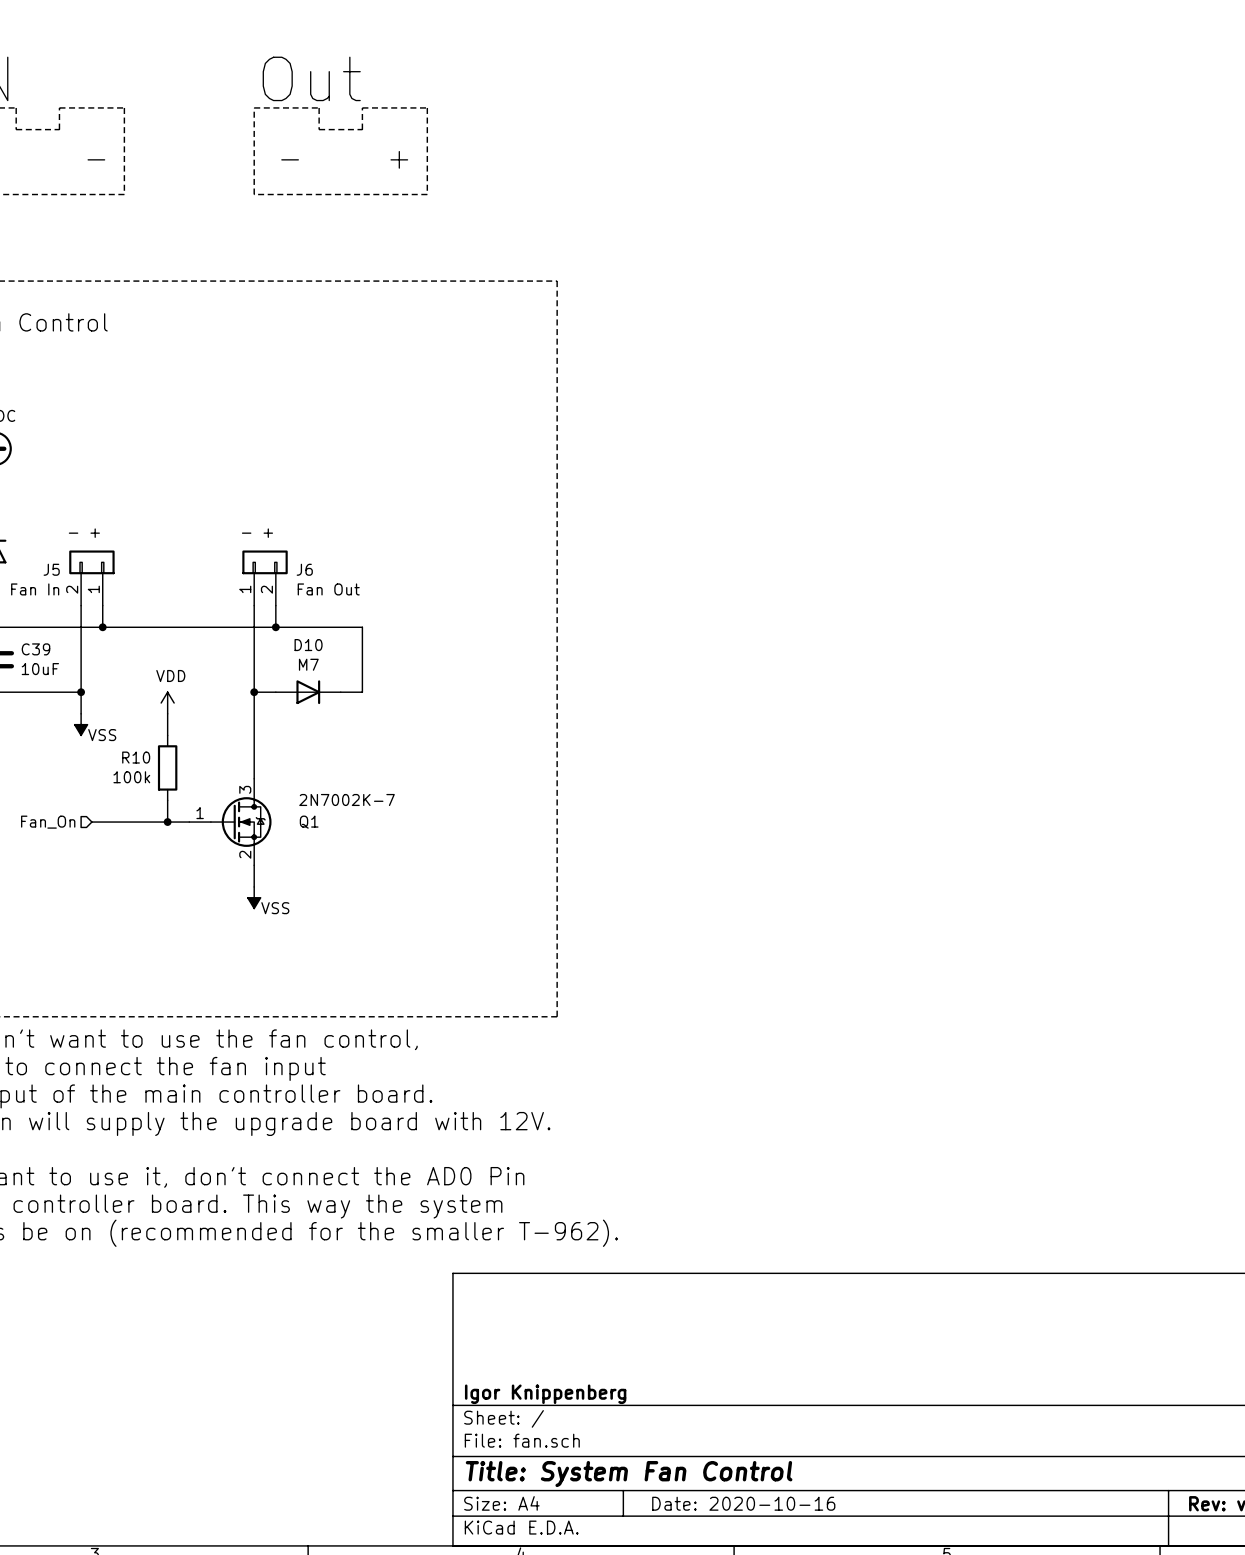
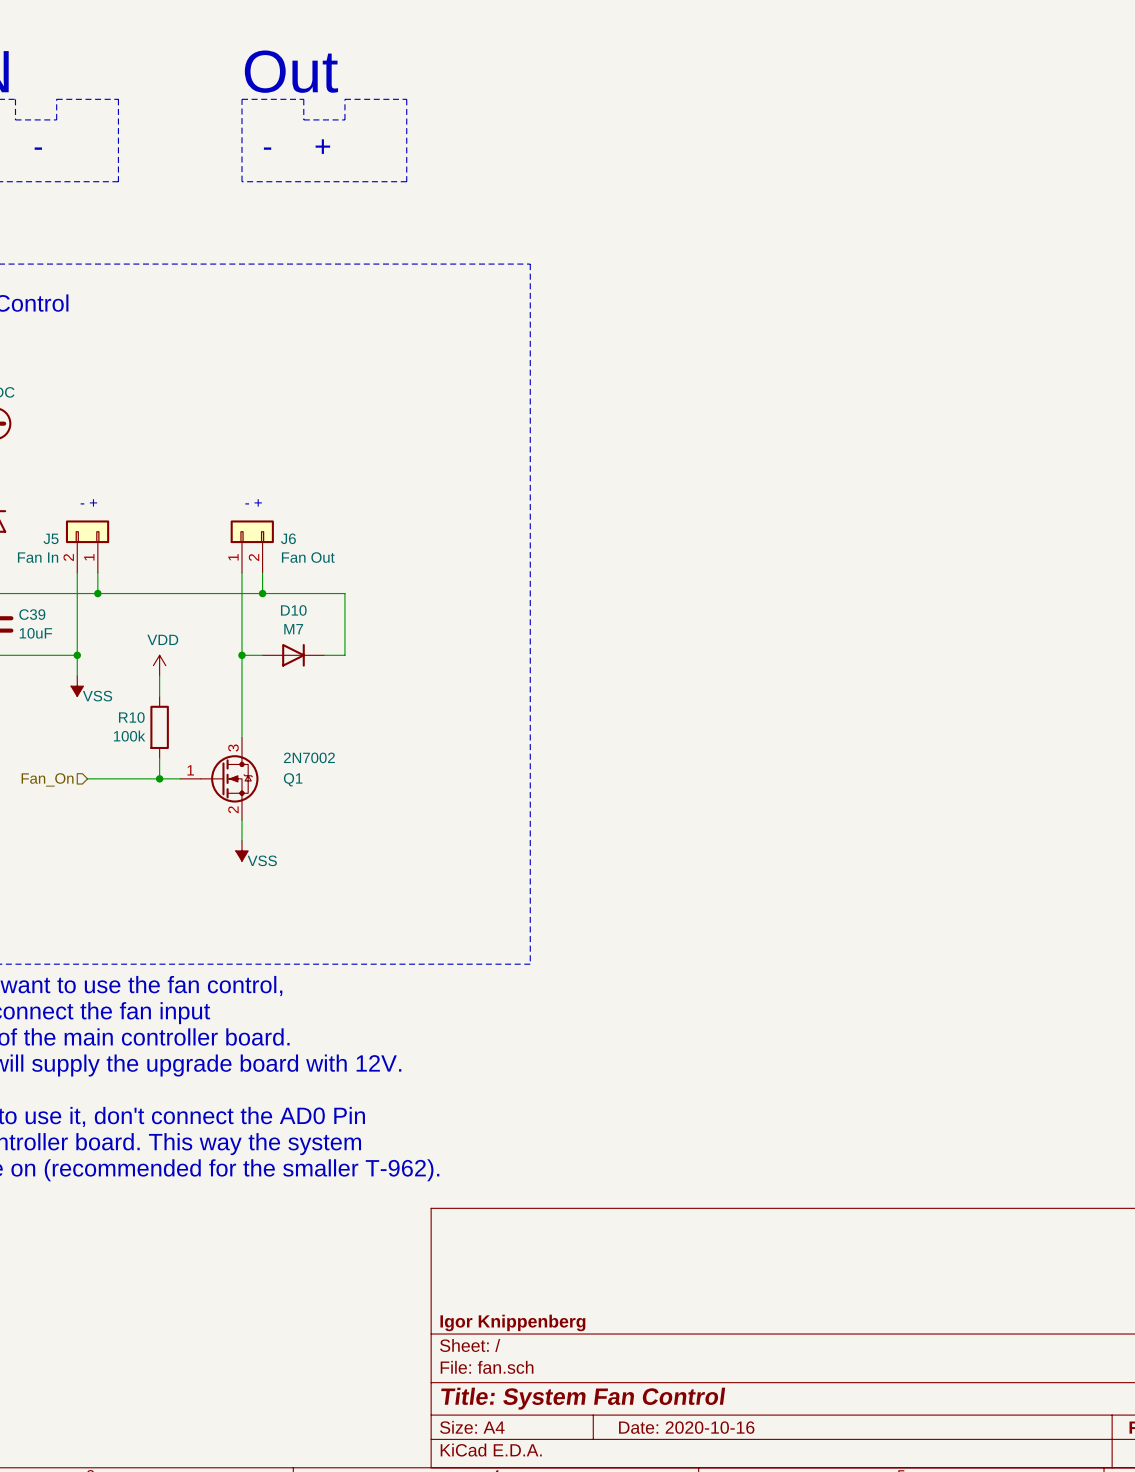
Q1 value: 2N7002K-7 (347, 799) -> 2N7002 (309, 757)

